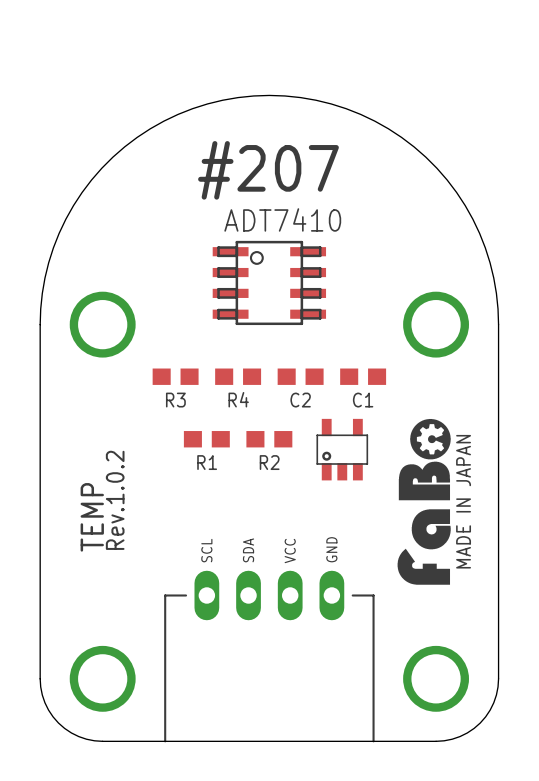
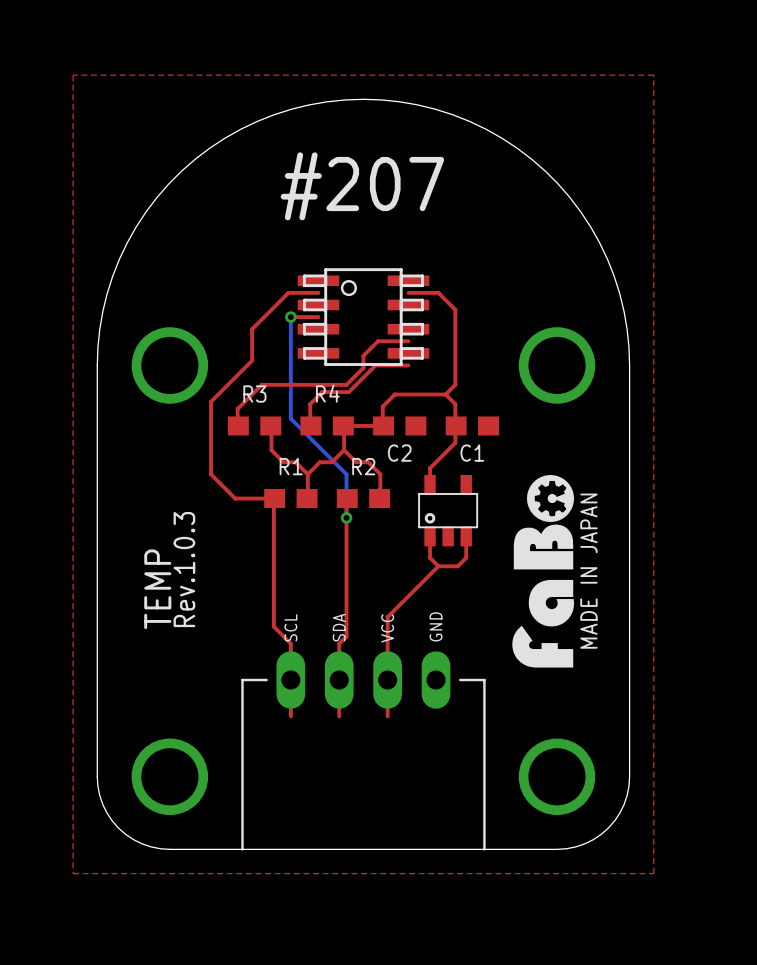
top zone outline: none -> (73, 75) (653, 75) (653, 873) (73, 873) (73, 75)
ADT7410 name: ADT7410 (282, 219) -> none
top track: none -> (318, 292) (288, 292) (252, 329) (252, 360) (211, 401) (211, 474) (235, 498) (274, 498) (273, 626) (290, 643) (290, 716)
top track: none -> (408, 292) (438, 292) (455, 309) (455, 384) (445, 394)
top track: none -> (290, 317) (318, 317)
bottom track: none -> (290, 317) (290, 418) (346, 474) (346, 517)
via: none -> (290, 317)
top track: none -> (408, 341) (377, 341) (363, 355) (363, 367) (346, 384) (261, 384) (237, 409) (238, 425)
top track: none -> (408, 365) (375, 365) (348, 392) (322, 392) (310, 404) (310, 425)
top track: none -> (445, 394) (394, 394) (382, 406) (383, 425) (343, 425) (344, 450)
top track: none -> (445, 394) (455, 404) (455, 442) (430, 468) (430, 484)
top track: none -> (270, 425) (271, 450) (283, 462) (295, 462) (307, 474)
top track: none -> (344, 450) (356, 462) (368, 462) (380, 474) (379, 498)
top track: none -> (344, 450) (332, 462) (319, 462) (307, 474)
R4 name position: R4 (238, 399) -> R4 (327, 393)
R3 name position: R3 (175, 400) -> R3 (254, 394)
top track: none -> (307, 474) (307, 498)
top track: none -> (347, 498) (346, 636) (339, 643) (339, 716)
via: none -> (346, 517)
R1 name position: R1 (207, 462) -> R1 (291, 466)
R2 name position: R2 (269, 462) -> R2 (363, 466)
top track: none -> (430, 536) (430, 557) (438, 566)
top track: none -> (466, 536) (466, 557) (457, 566) (438, 566)
top track: none -> (438, 566) (387, 617) (387, 716)
text: Rev.1.0.2 (115, 500) -> Rev.1.0.3 (184, 569)

